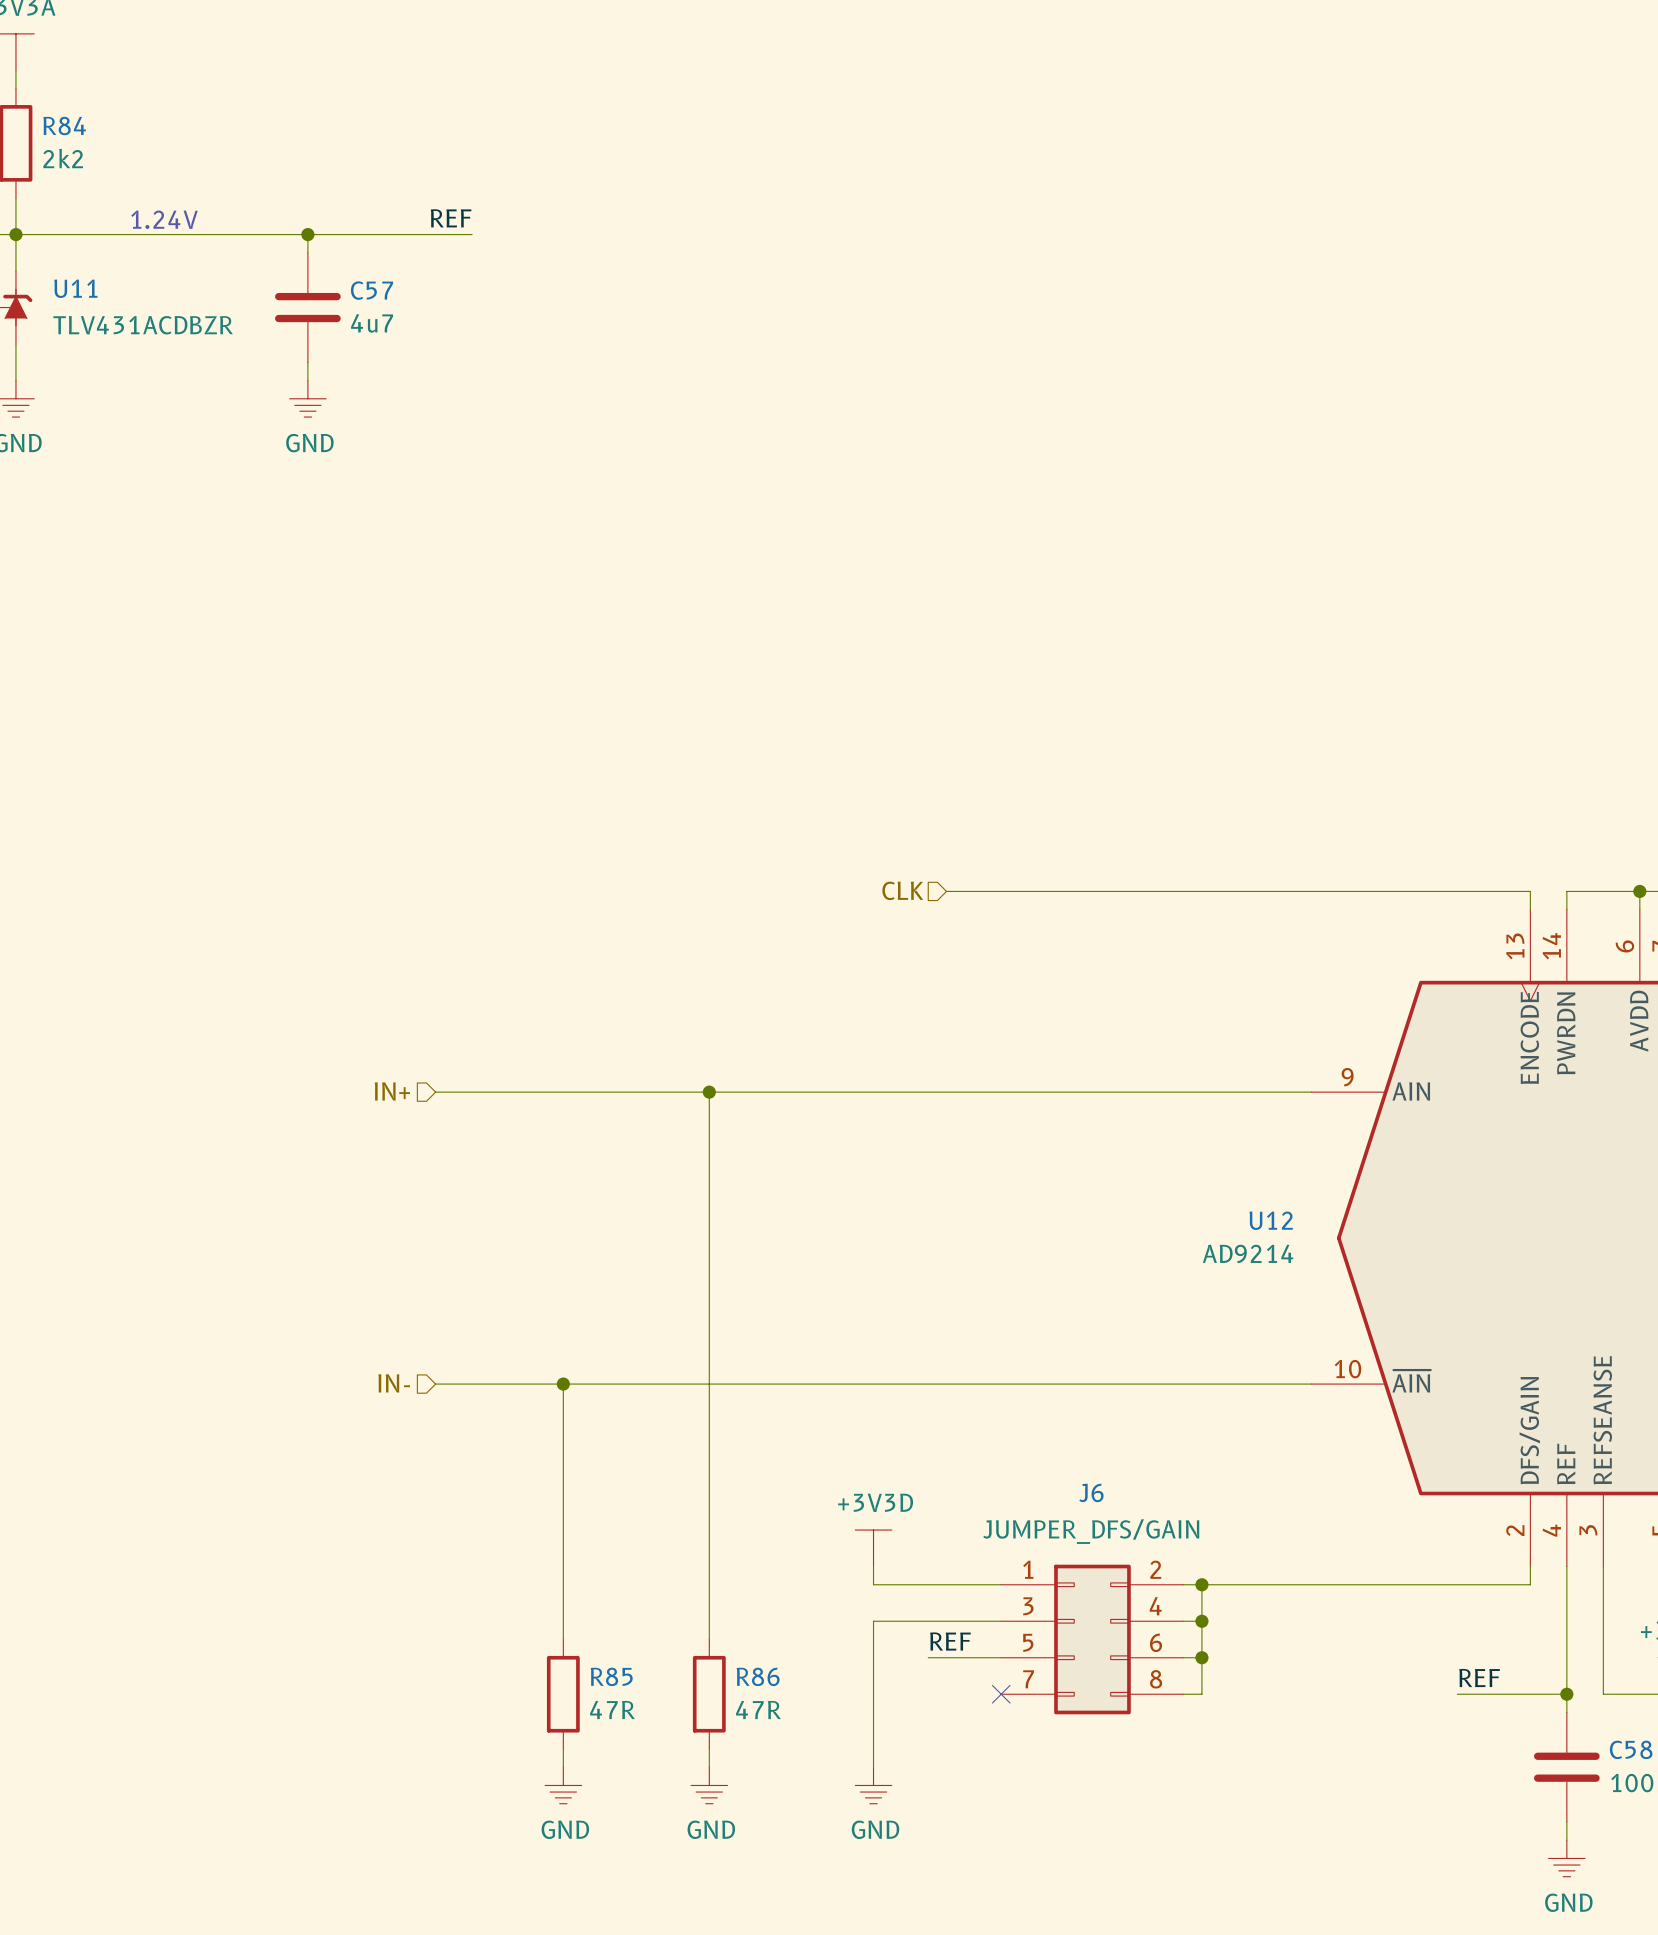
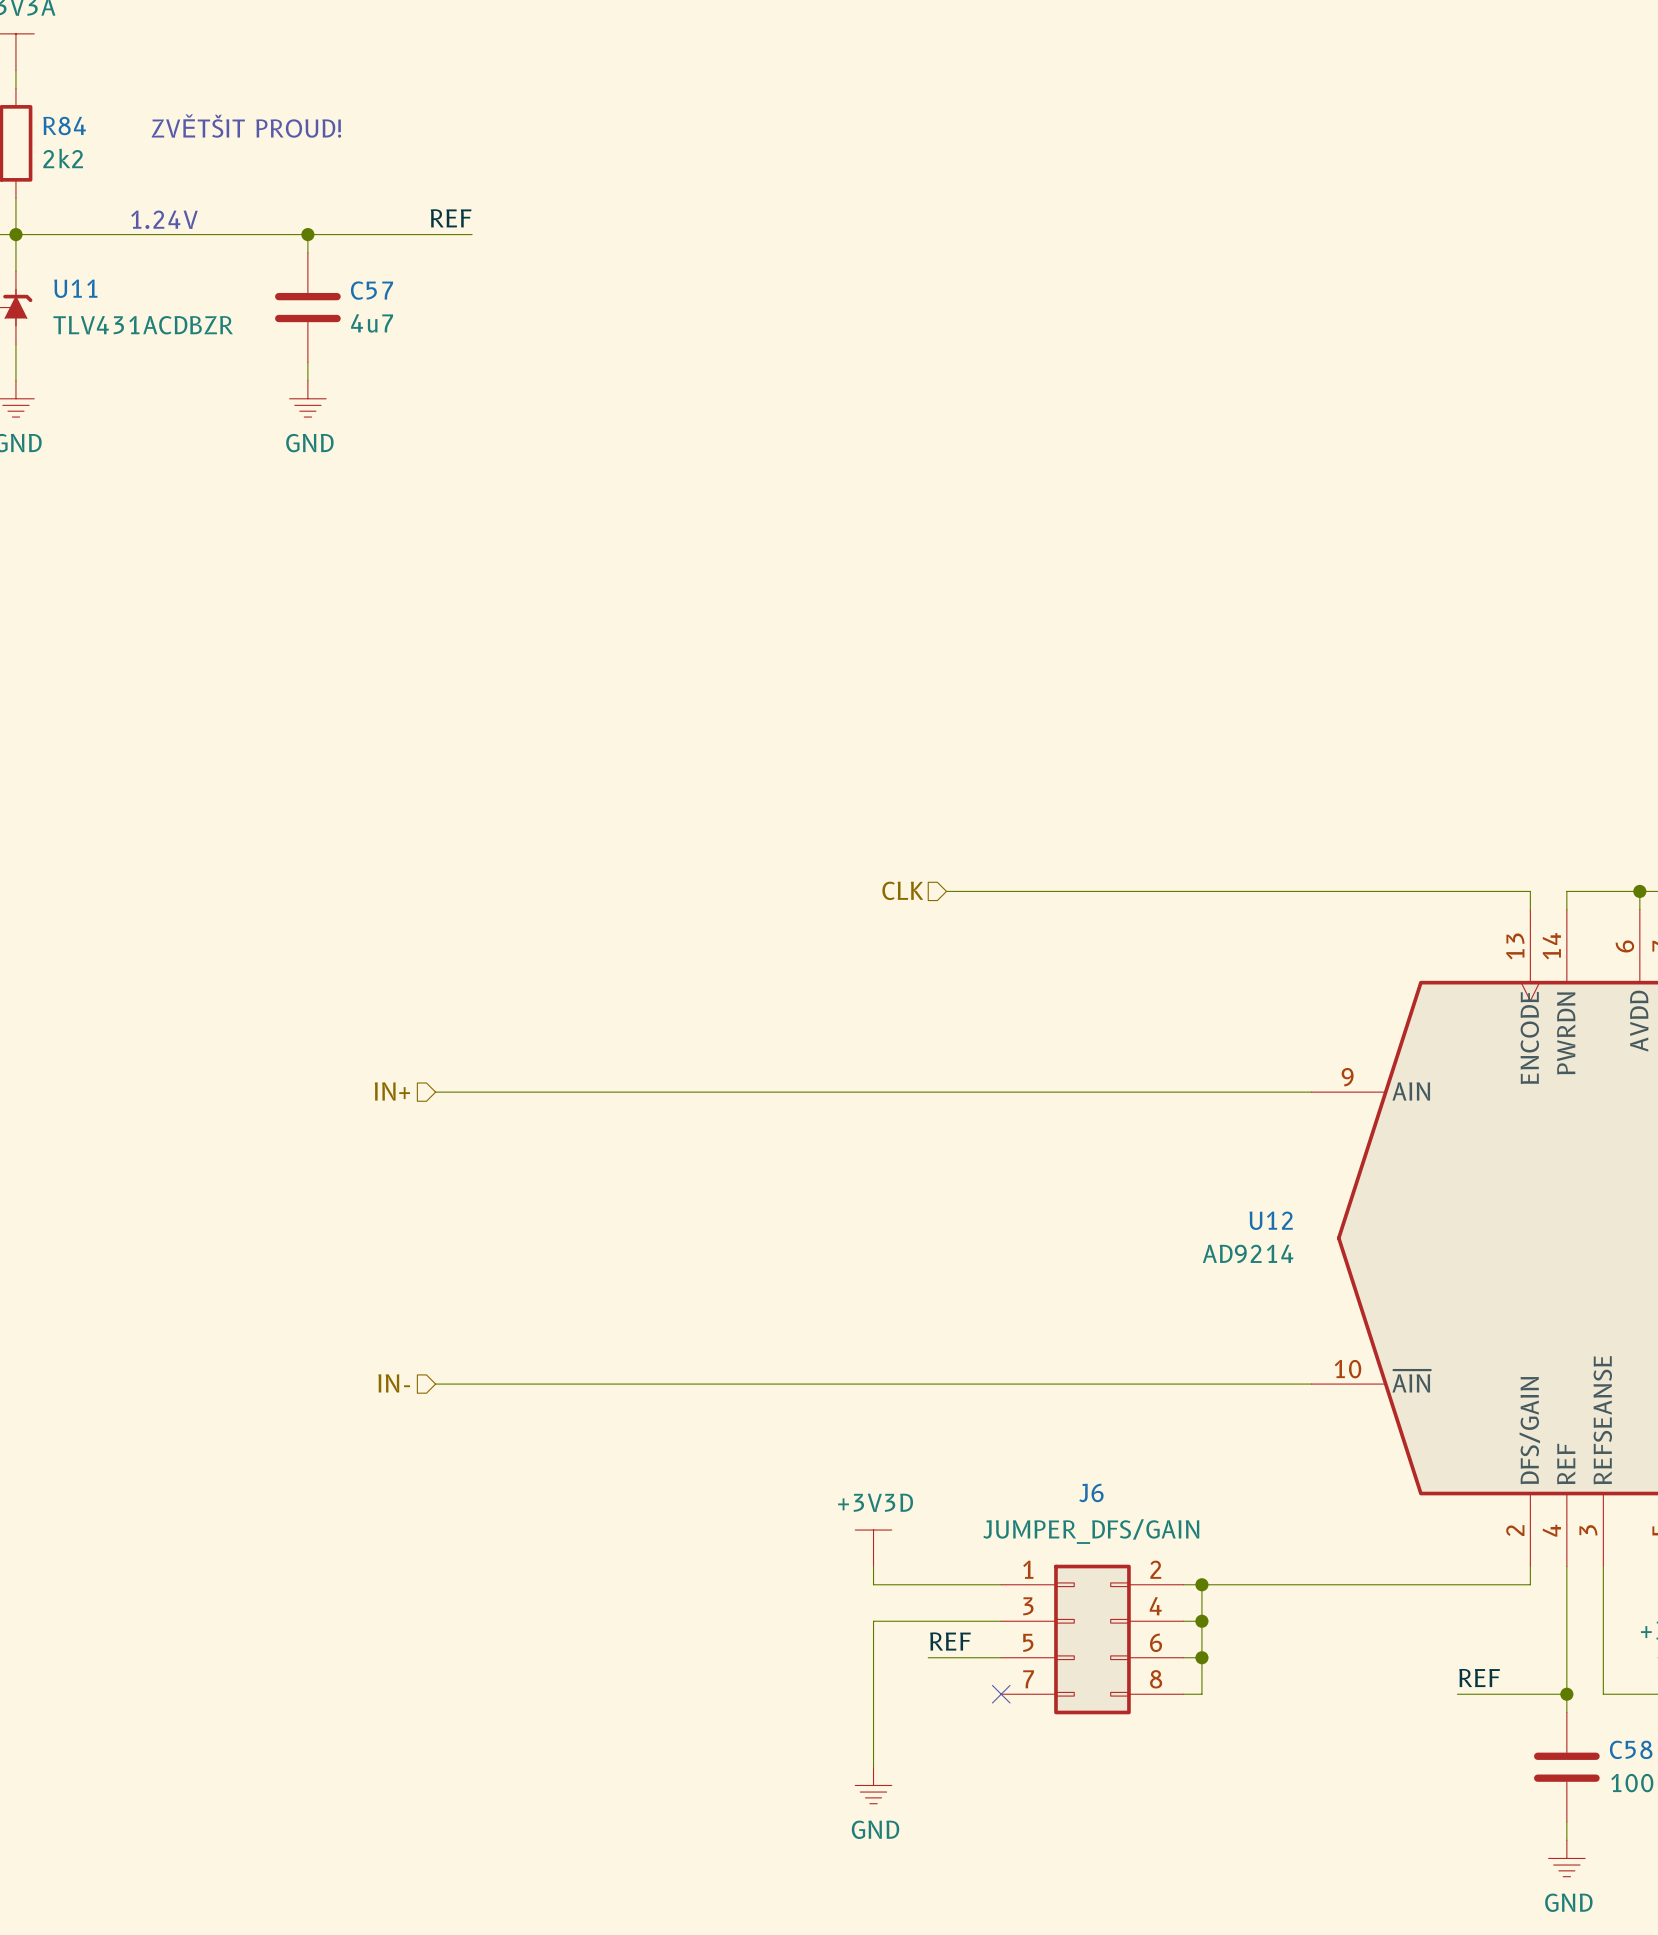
text: none -> ZVĚTŠIT PROUD! (246, 126)
wire: (709, 1092) (709, 1639) -> none
junction: (709, 1092) -> none
wire: (563, 1384) (563, 1639) -> none
junction: (563, 1384) -> none
R85: 47R (563, 1694) -> none
R86: 47R (709, 1694) -> none
wire: (563, 1748) (563, 1767) -> none
wire: (709, 1748) (709, 1767) -> none
power symbol: GND (563, 1785) -> none
power symbol: GND (709, 1785) -> none

